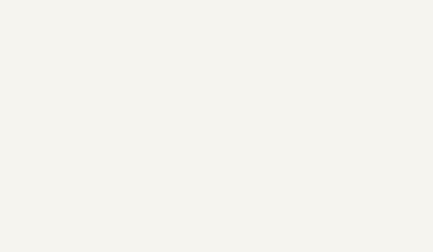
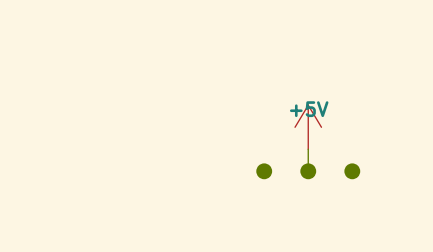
power symbol: none -> +5V (308, 127)
wire: none -> (308, 149) (308, 171)
junction: none -> (264, 171)
junction: none -> (308, 171)
junction: none -> (352, 171)

